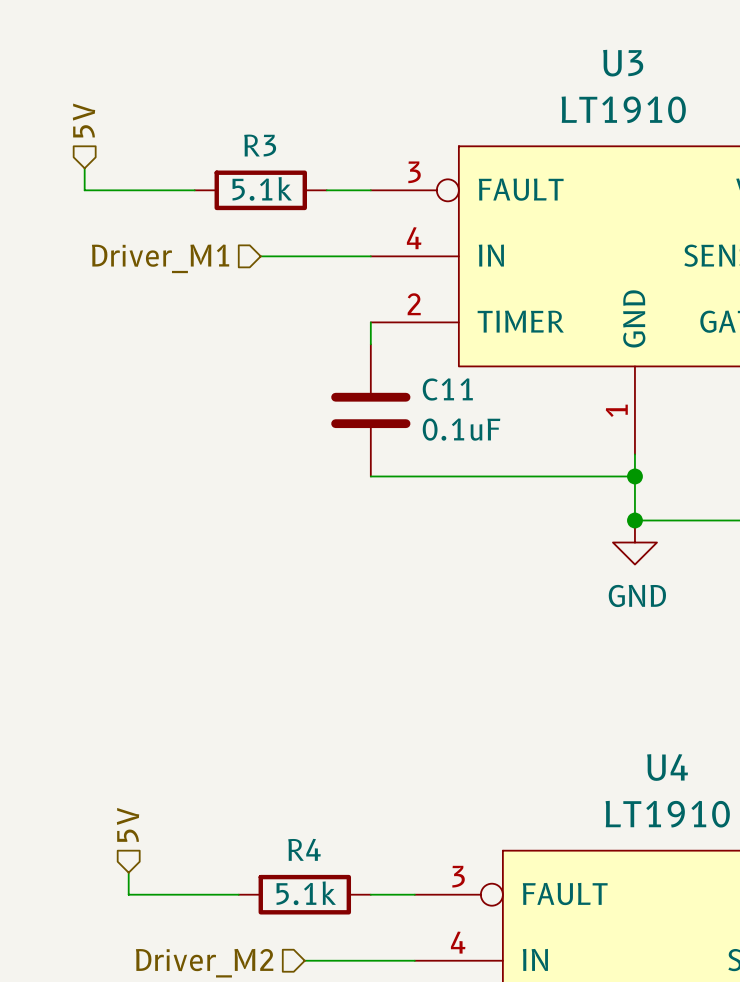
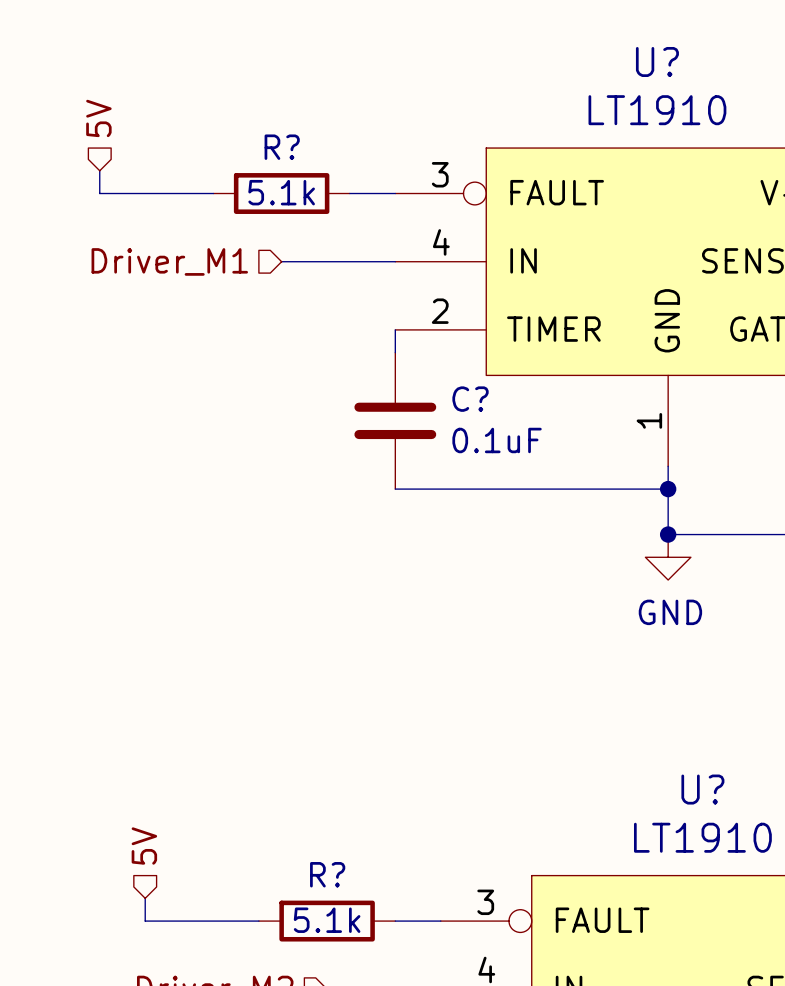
U3 name: U3 (623, 63) -> U? (657, 61)
R3 name: R3 (260, 145) -> R? (282, 147)
C11 name: C11 (447, 389) -> C? (470, 399)
U4 name: U4 (667, 767) -> U? (702, 789)
R4 name: R4 (304, 849) -> R? (327, 874)

